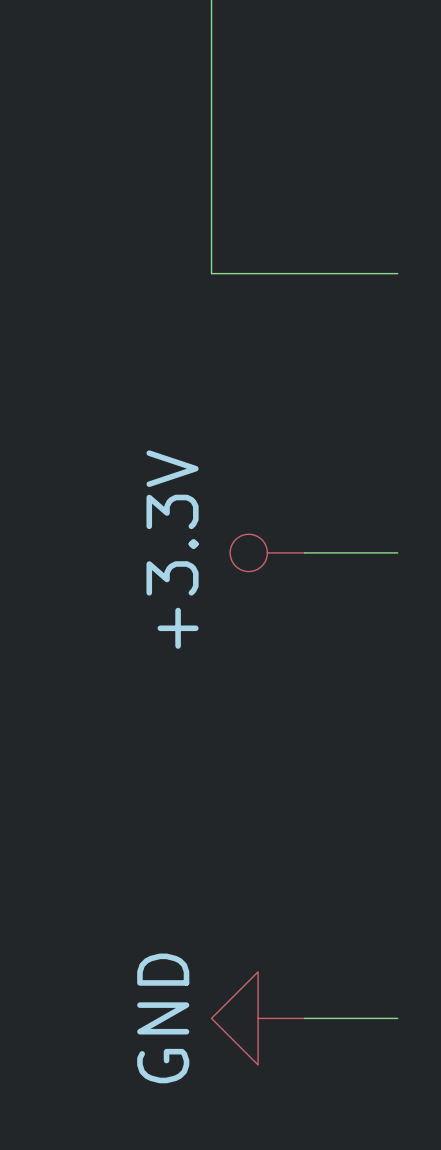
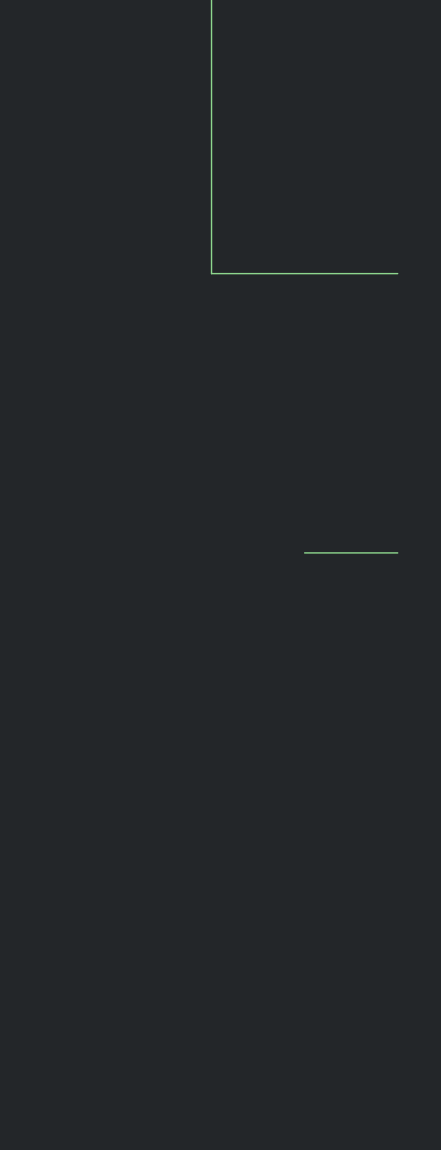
power symbol: +3.3V (267, 552) -> none
power symbol: GND (258, 1018) -> none
wire: (304, 1018) (397, 1018) -> none

